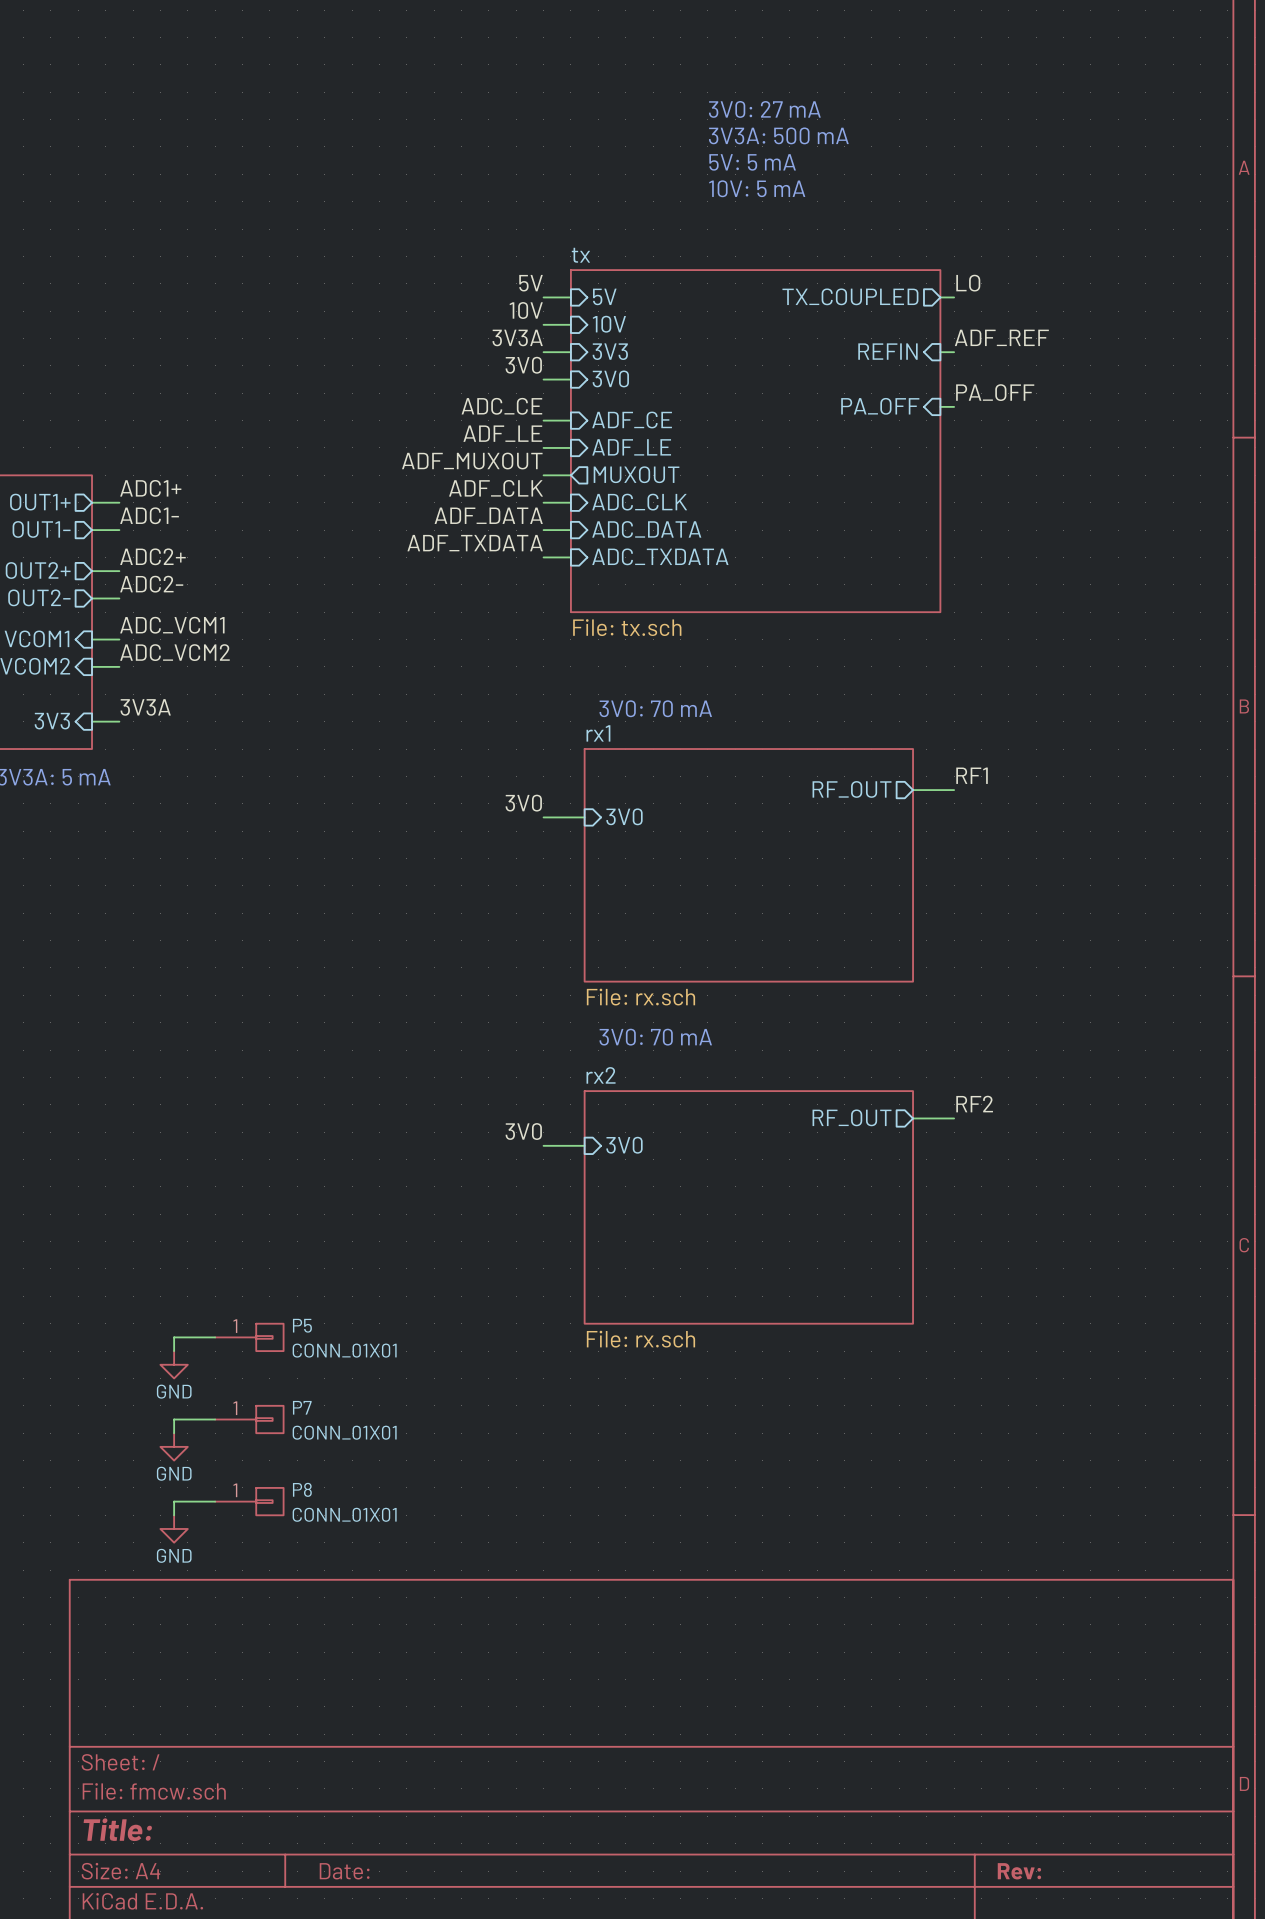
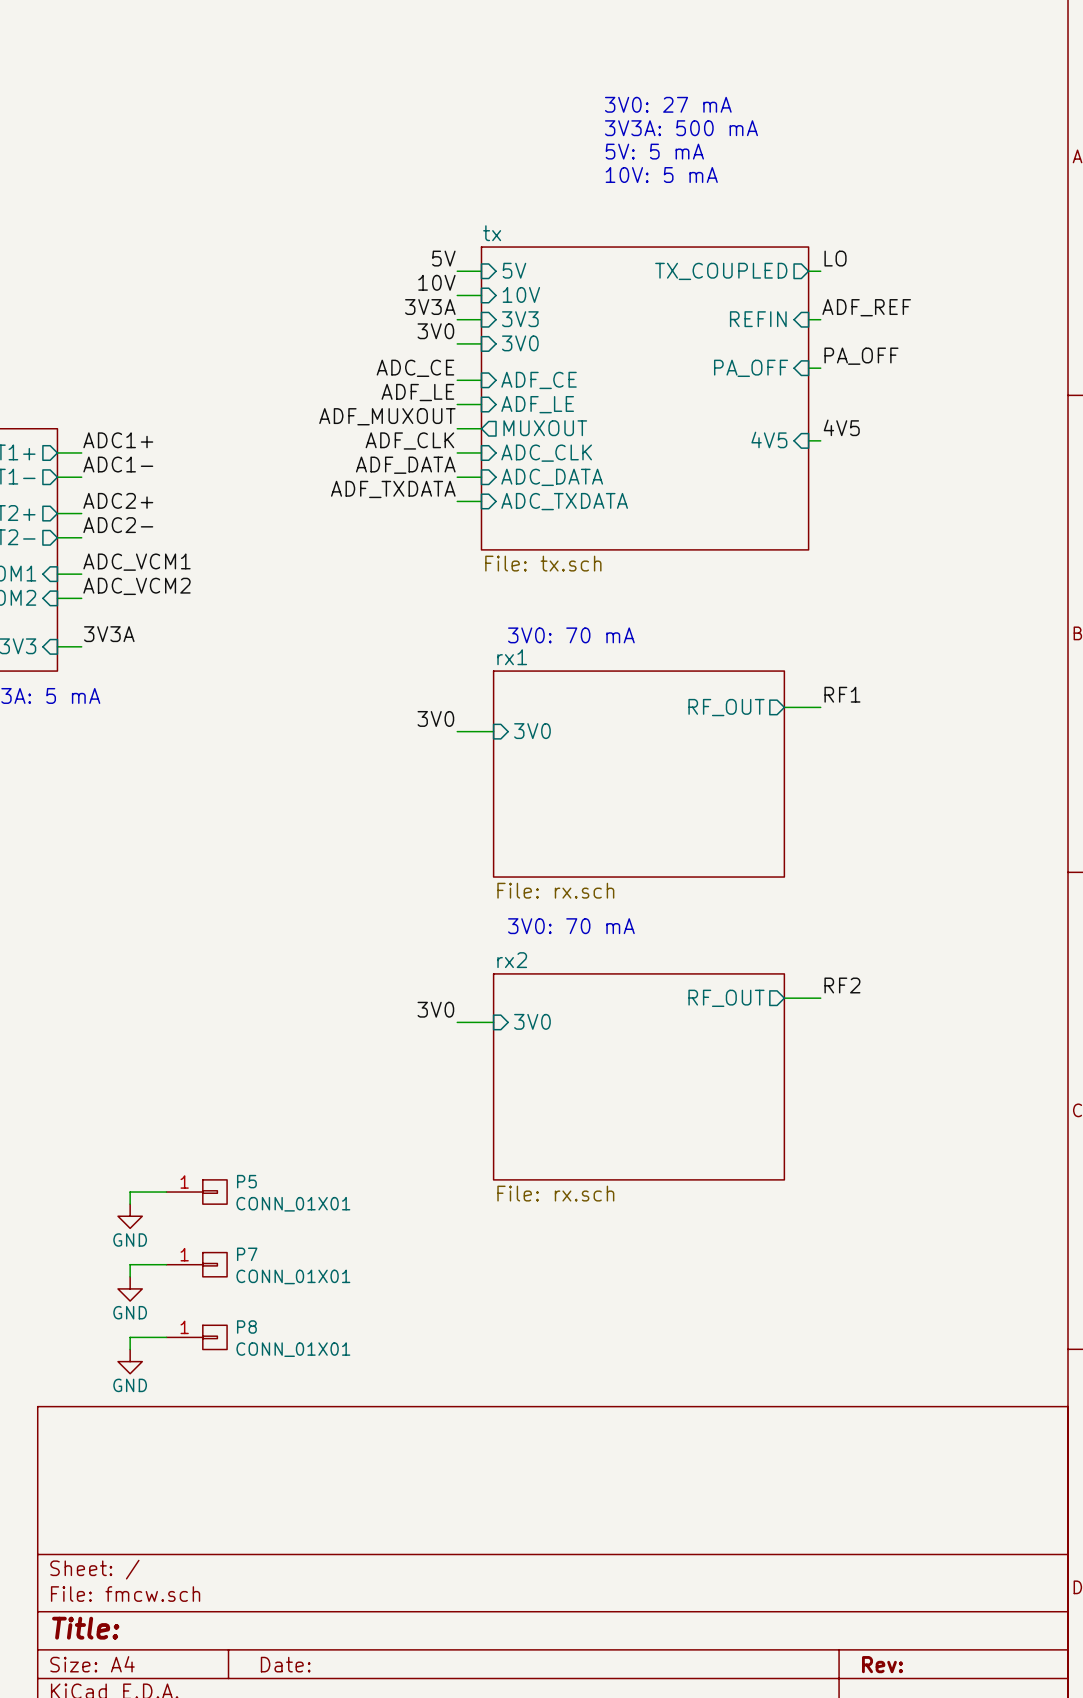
label: none -> 4V5 (841, 427)
sheet pin: none -> 4V5 (769, 439)
wire: none -> (808, 440) (820, 440)

